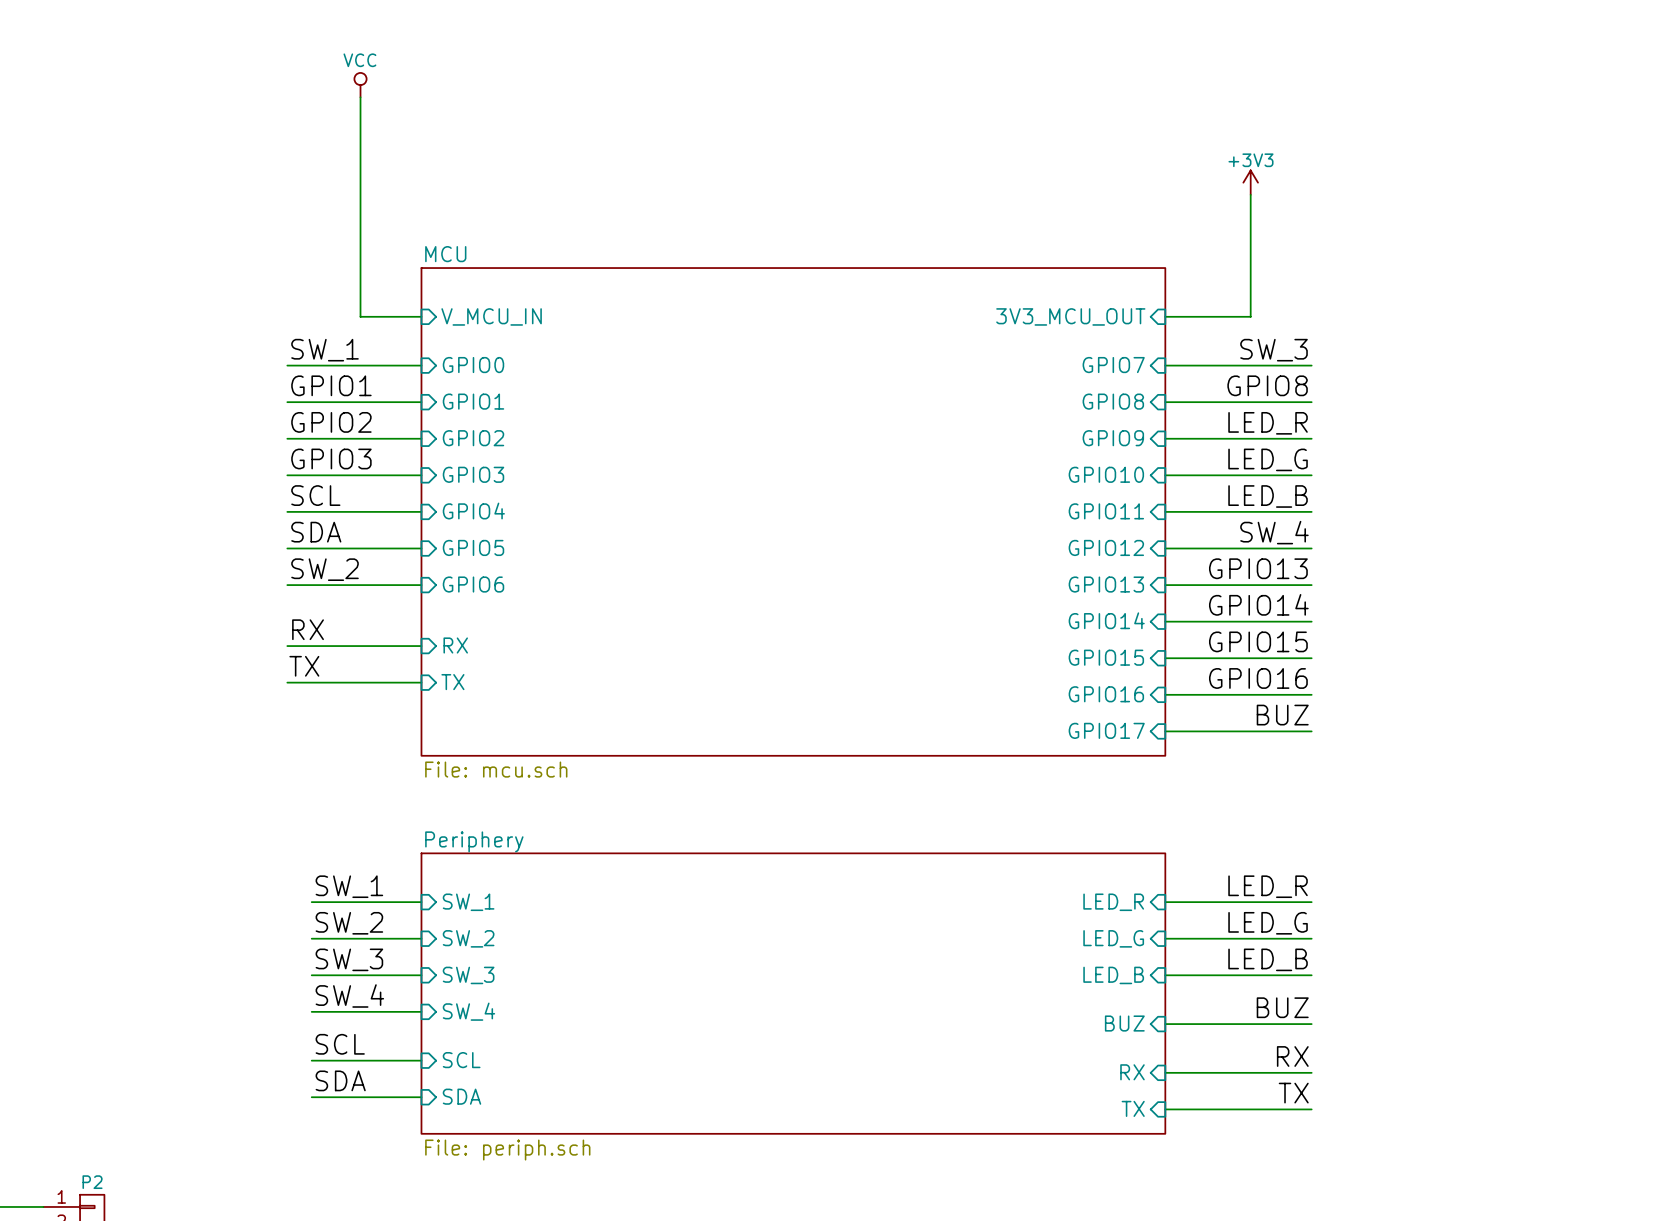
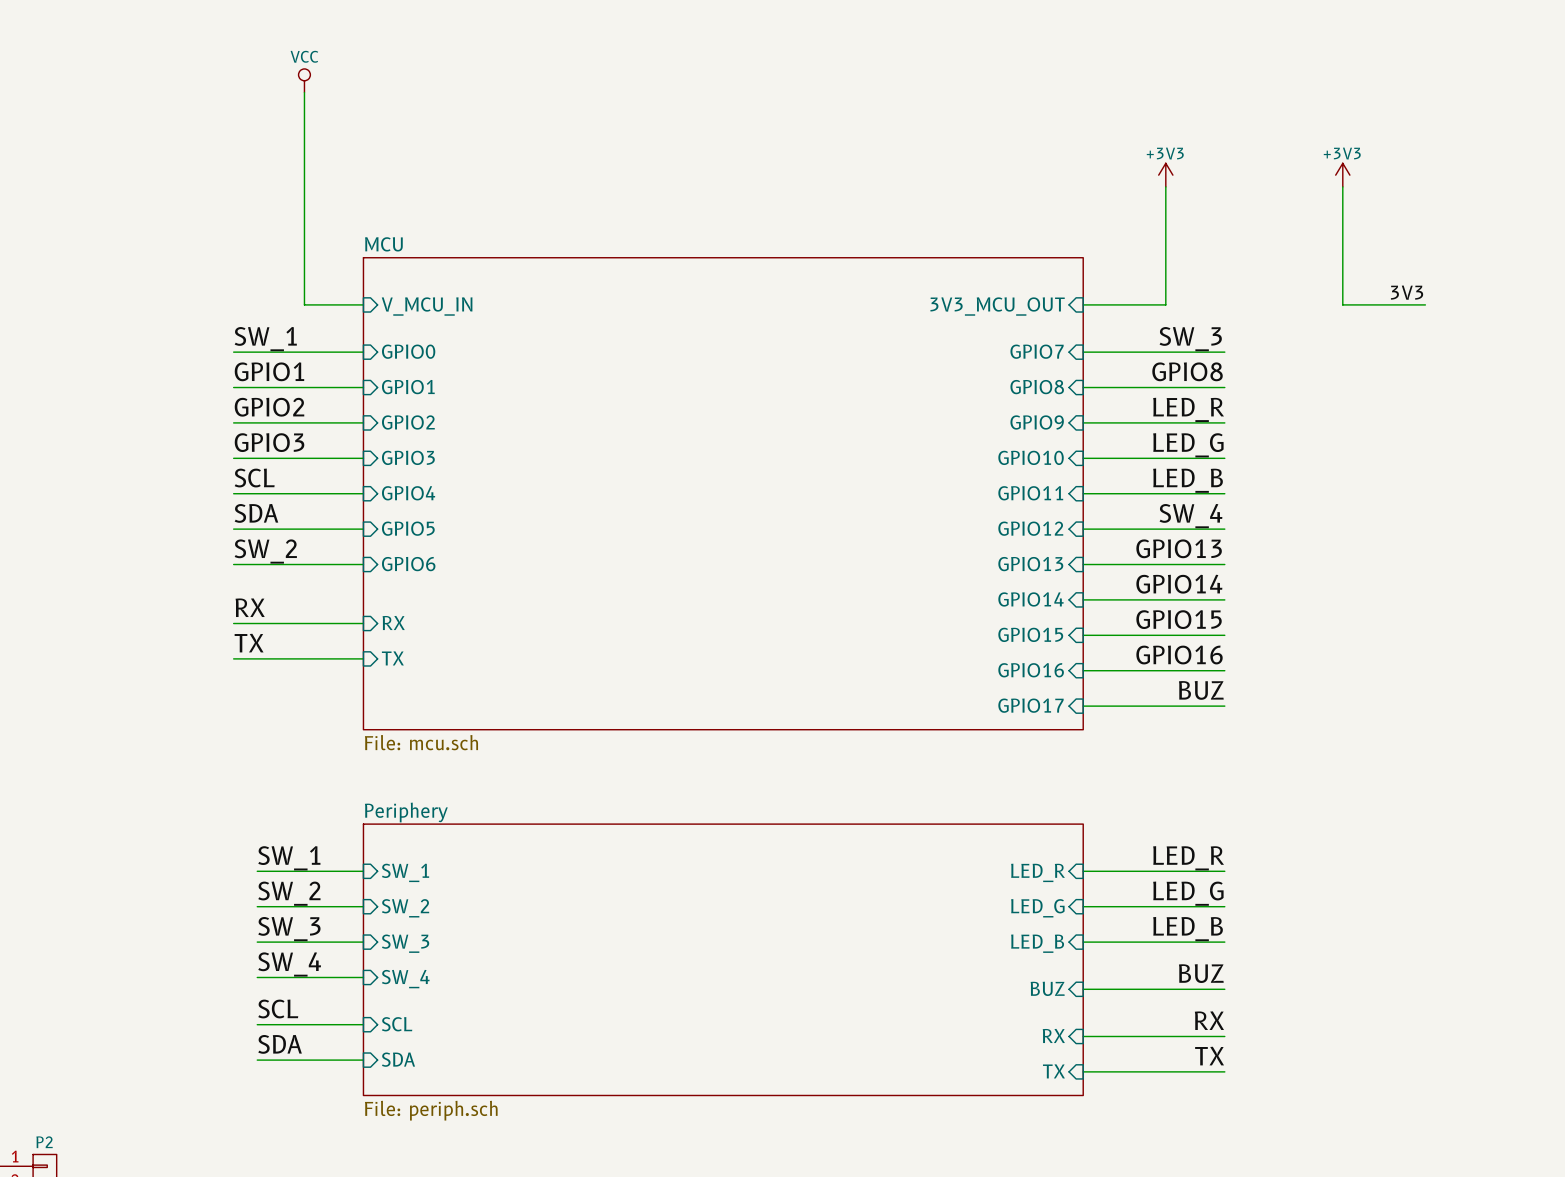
power symbol: none -> +3V3 (1342, 175)
wire: none -> (1342, 186) (1342, 304) (1425, 304)
label: none -> 3V3 (1407, 292)

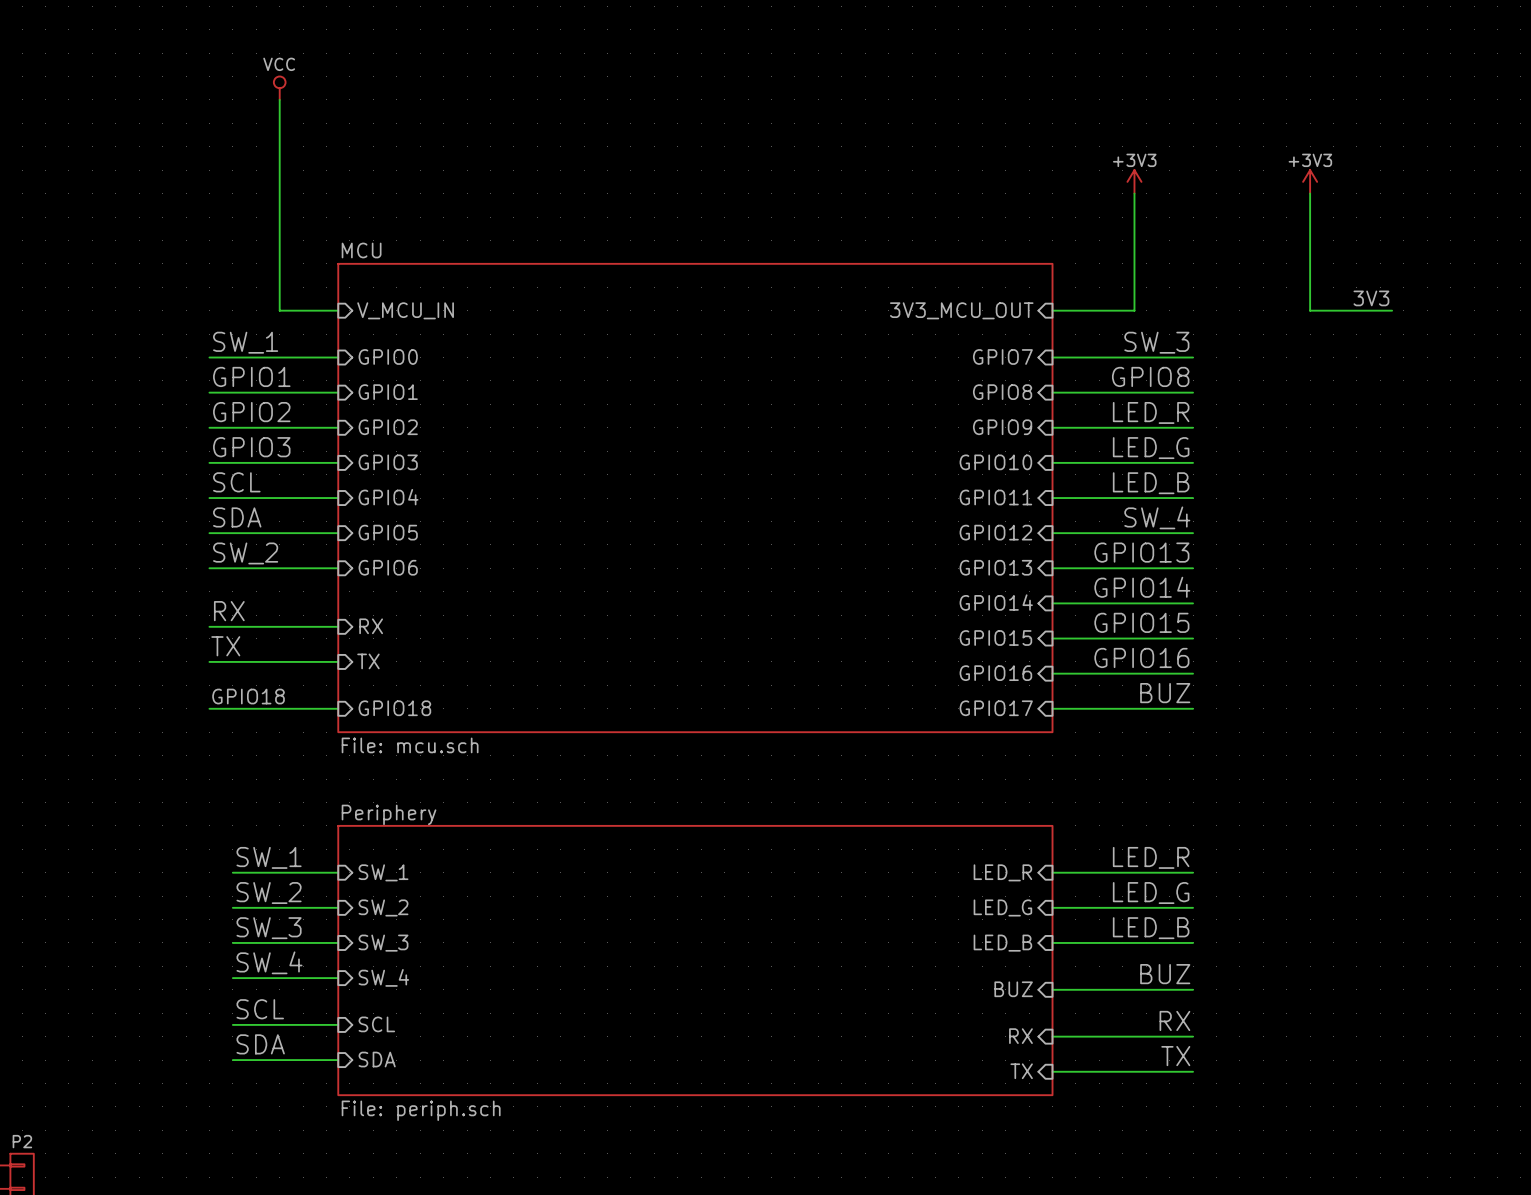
label: none -> GPIO18 (248, 696)
sheet pin: none -> GPIO18 (394, 708)
wire: none -> (209, 708) (338, 708)

